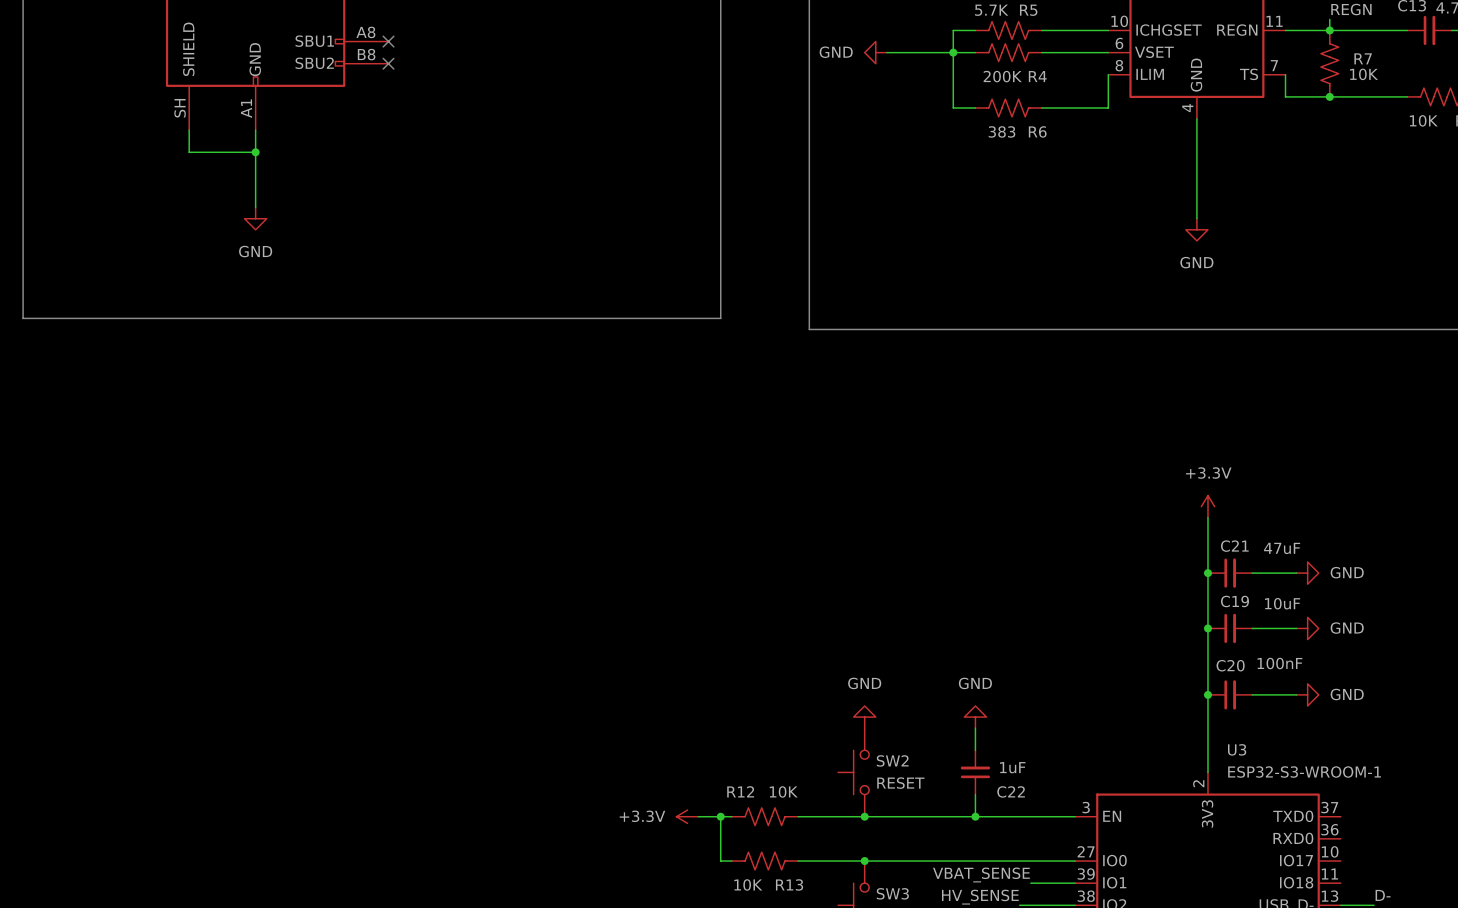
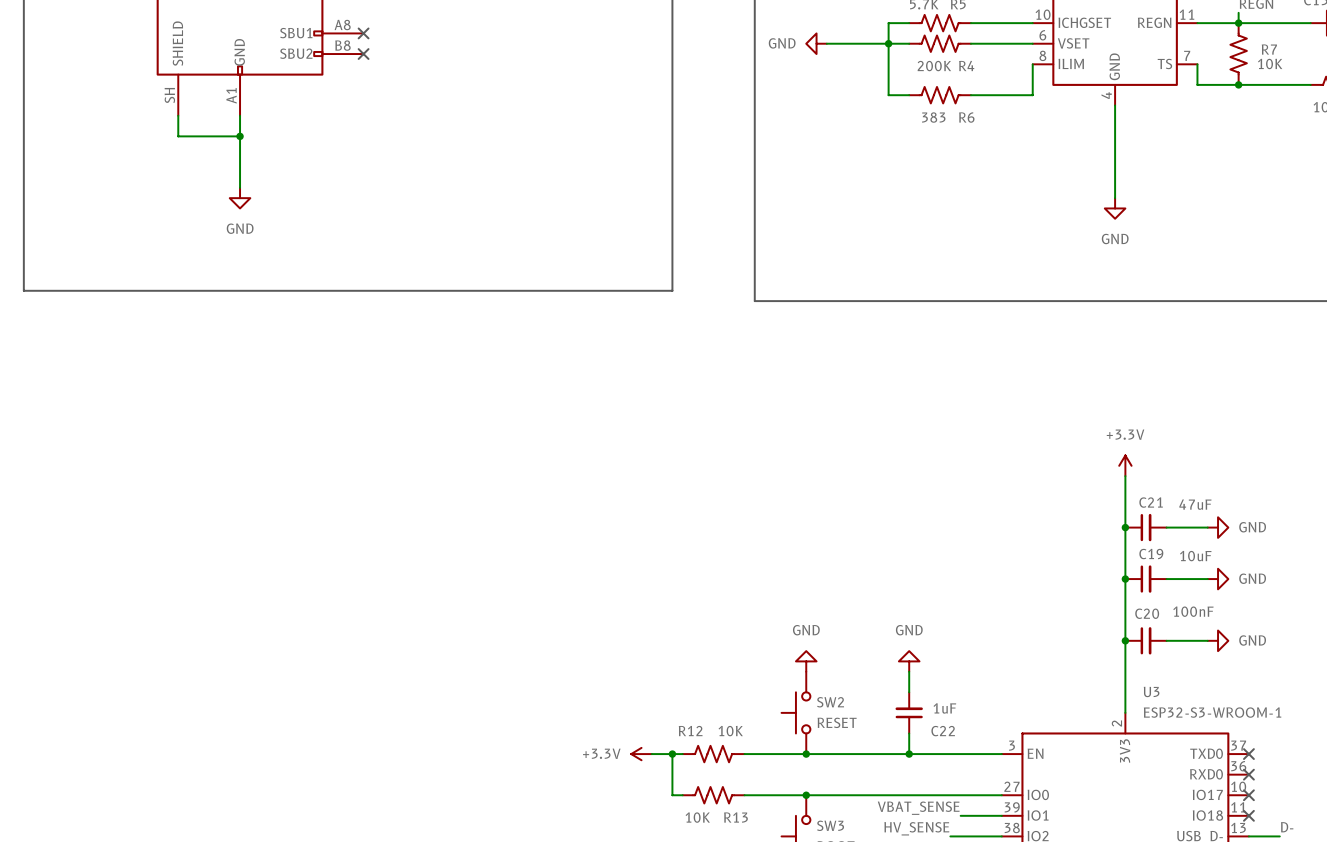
no-connect mark: none -> (1248, 754)
no-connect mark: none -> (1248, 774)
no-connect mark: none -> (1248, 795)
no-connect mark: none -> (1248, 815)

